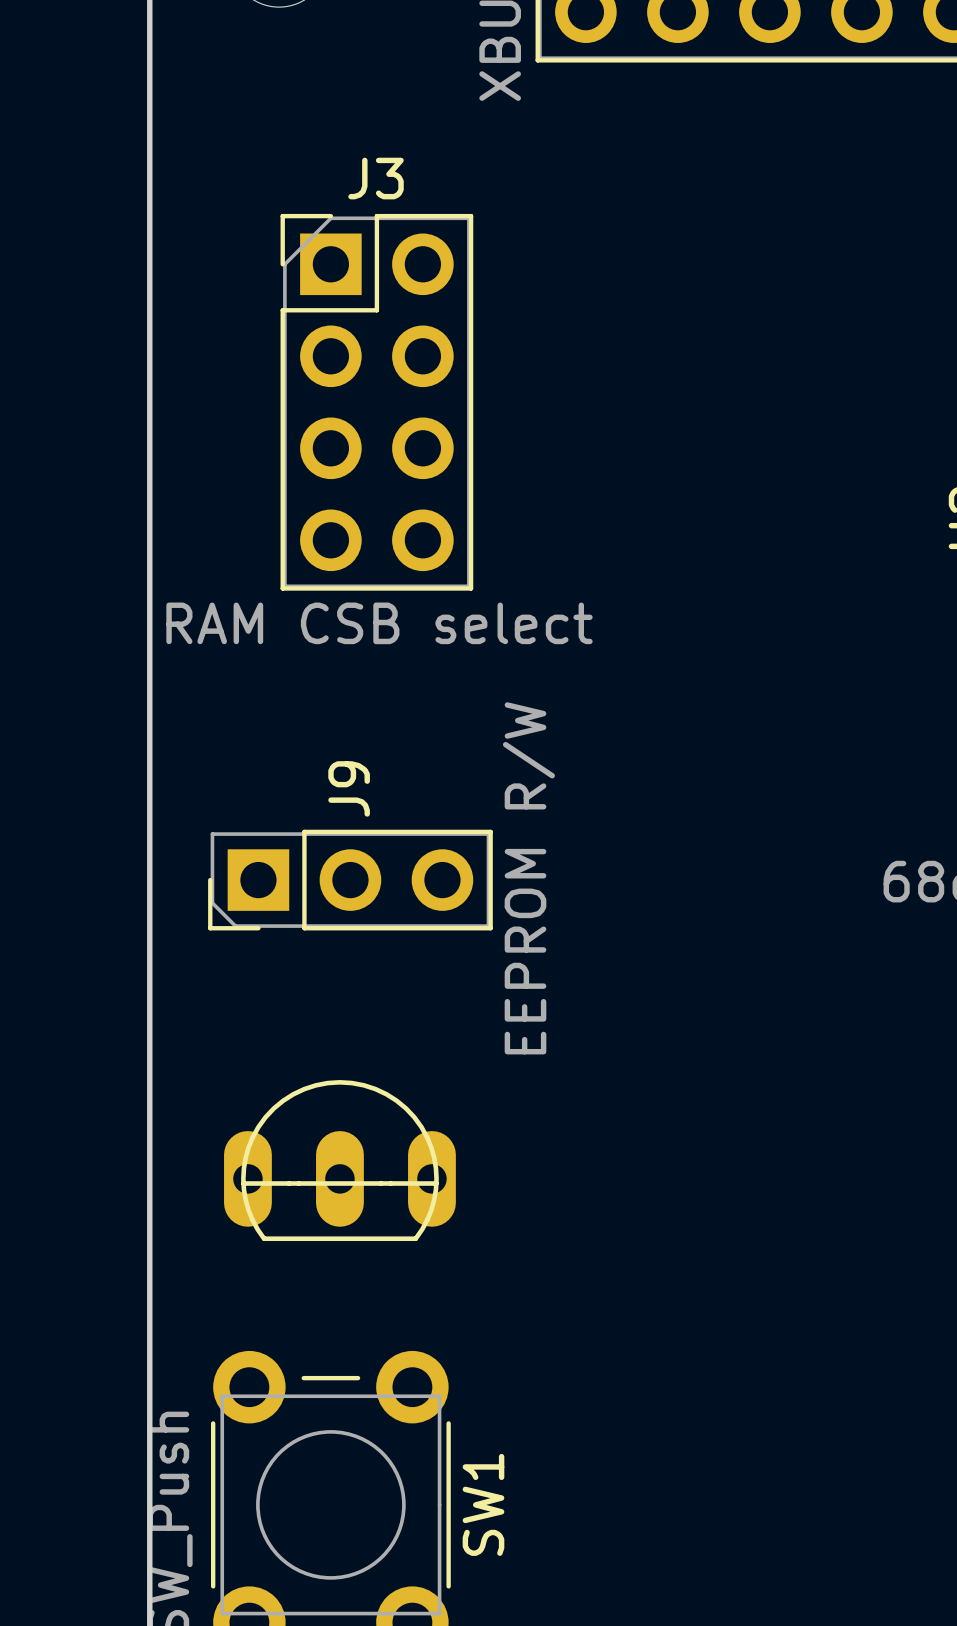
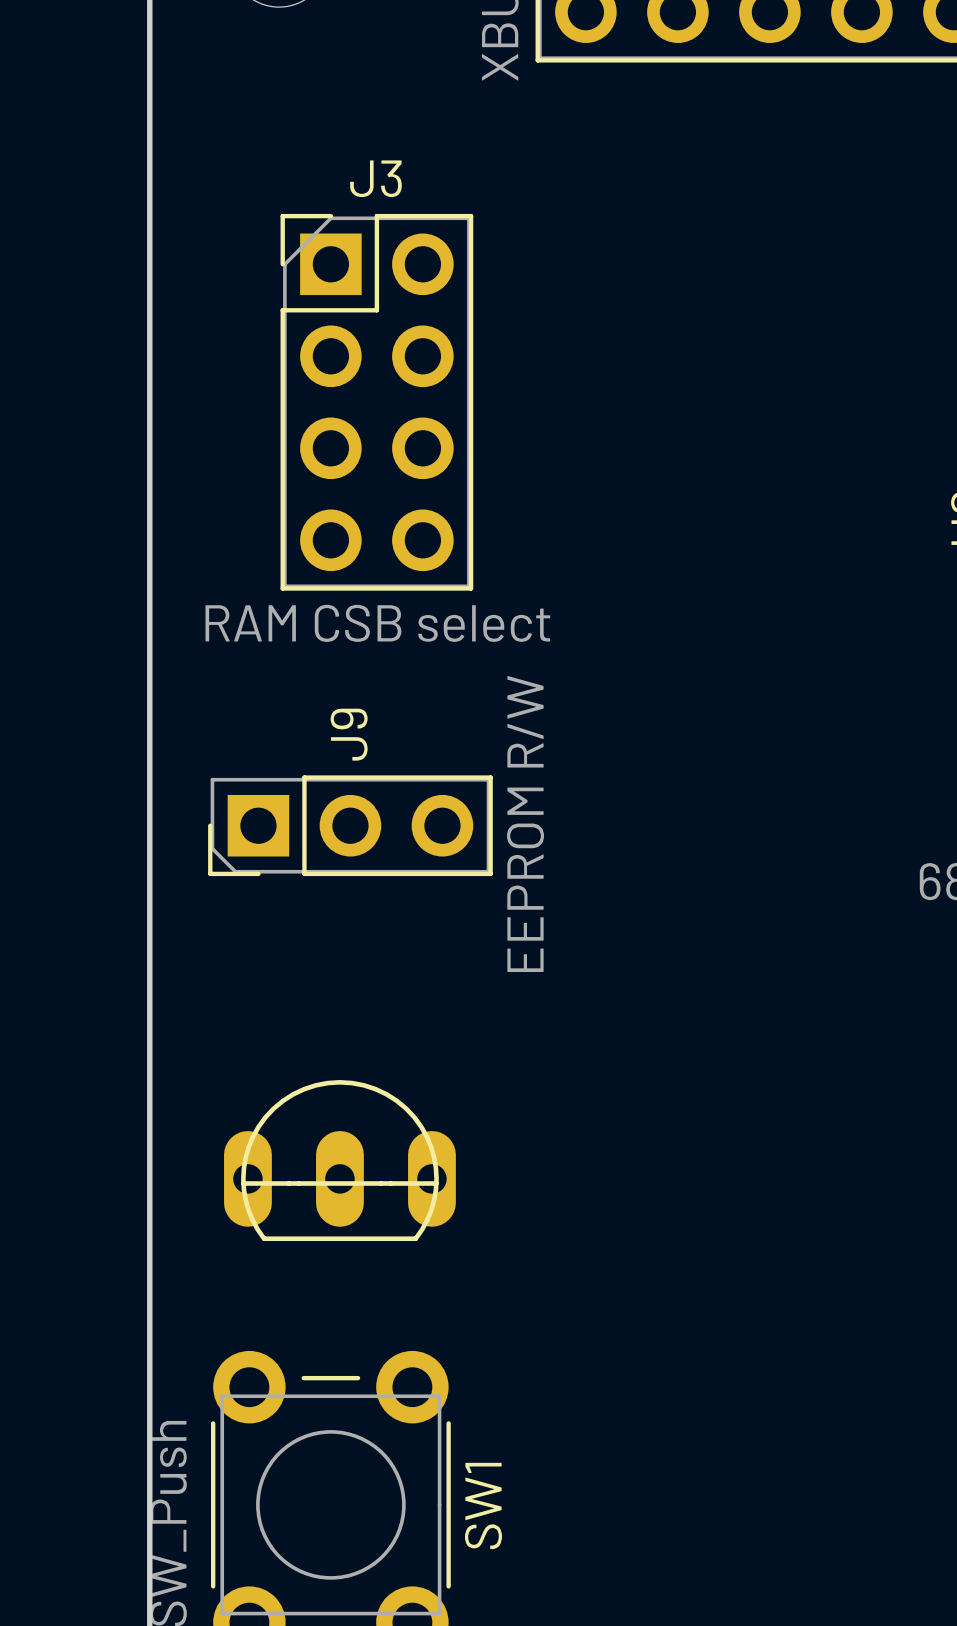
J9 position: (350, 880) -> (350, 825)

